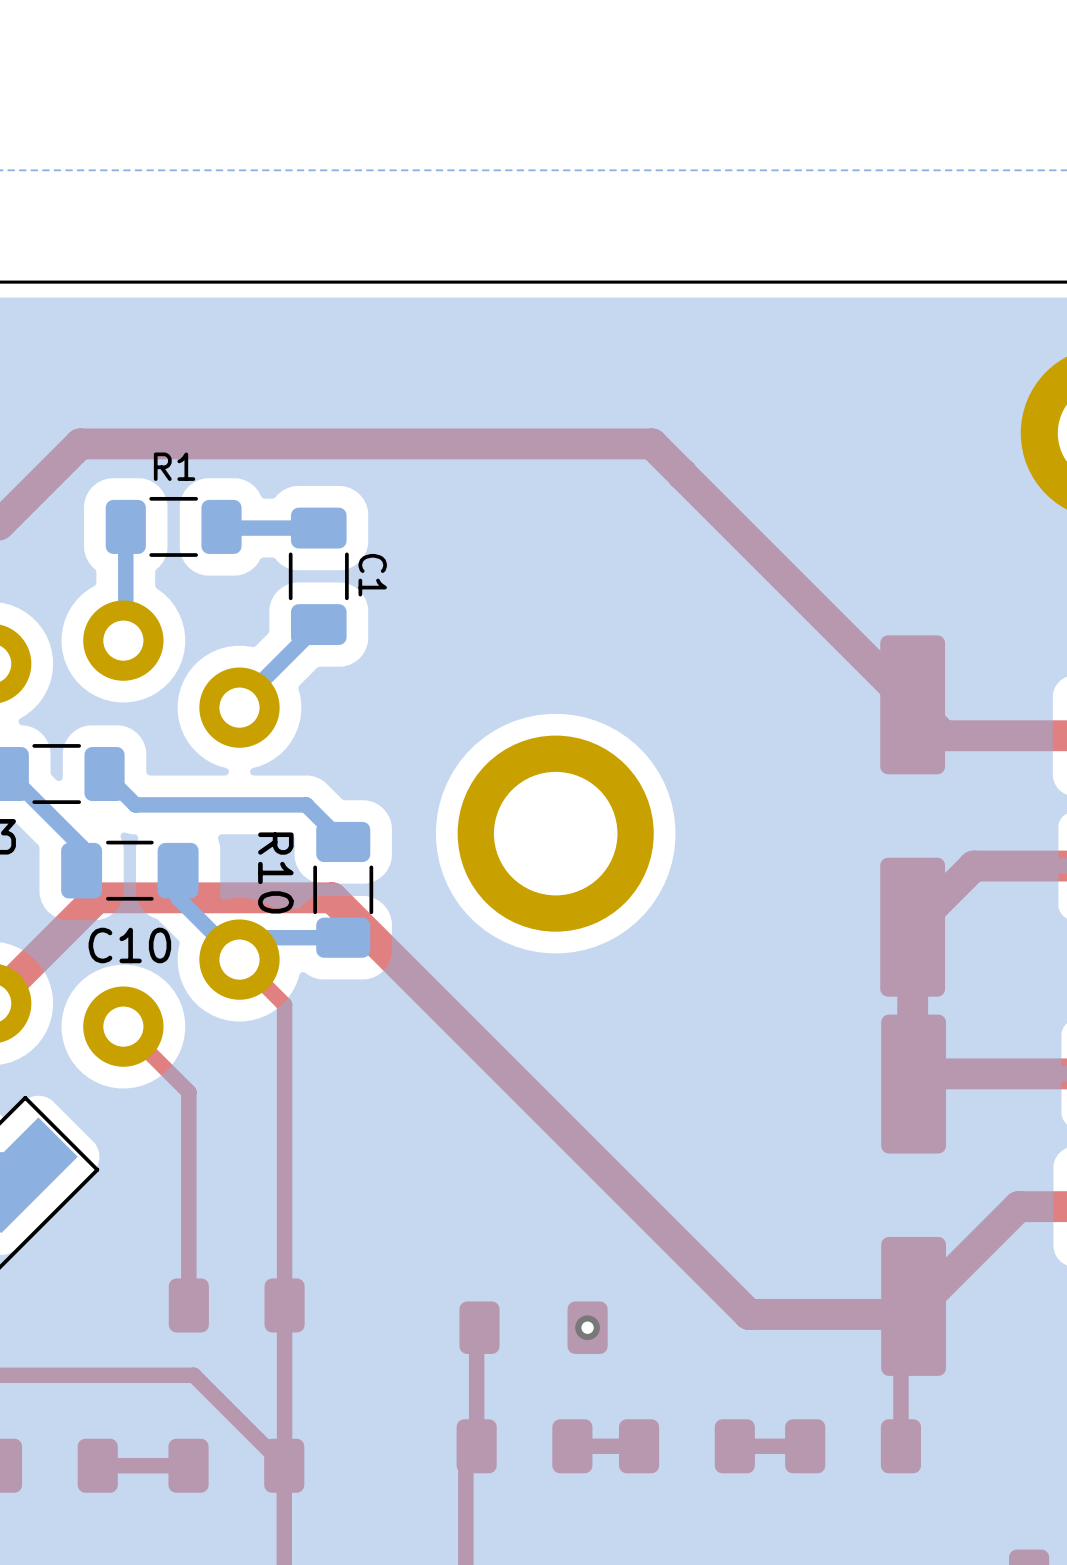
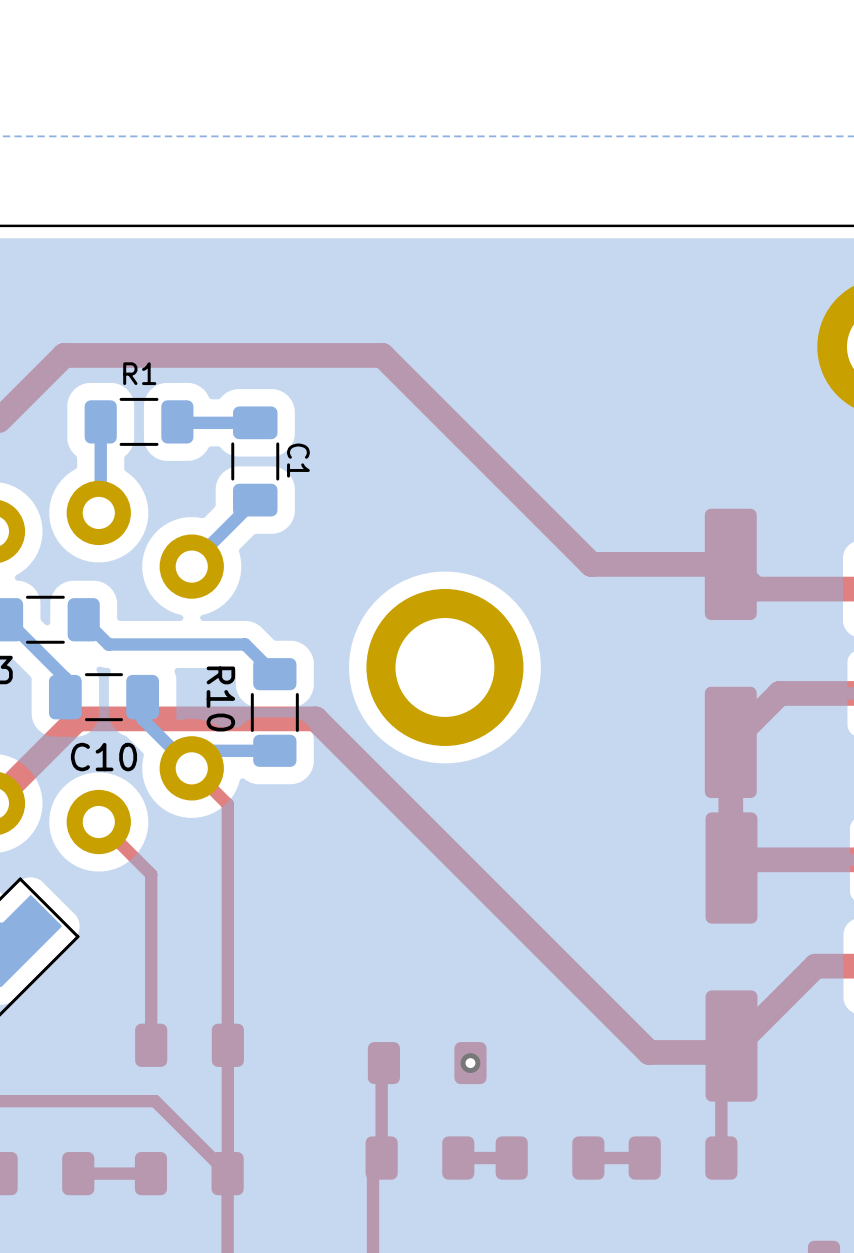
top track: (477, 443) (652, 443) (682, 474) -> none
top track: (682, 474) (912, 704) -> (382, 355) (591, 564) (730, 564)
top track: (332, 897) (749, 1314) (810, 1314) -> (266, 718) (315, 718) (649, 1052)

